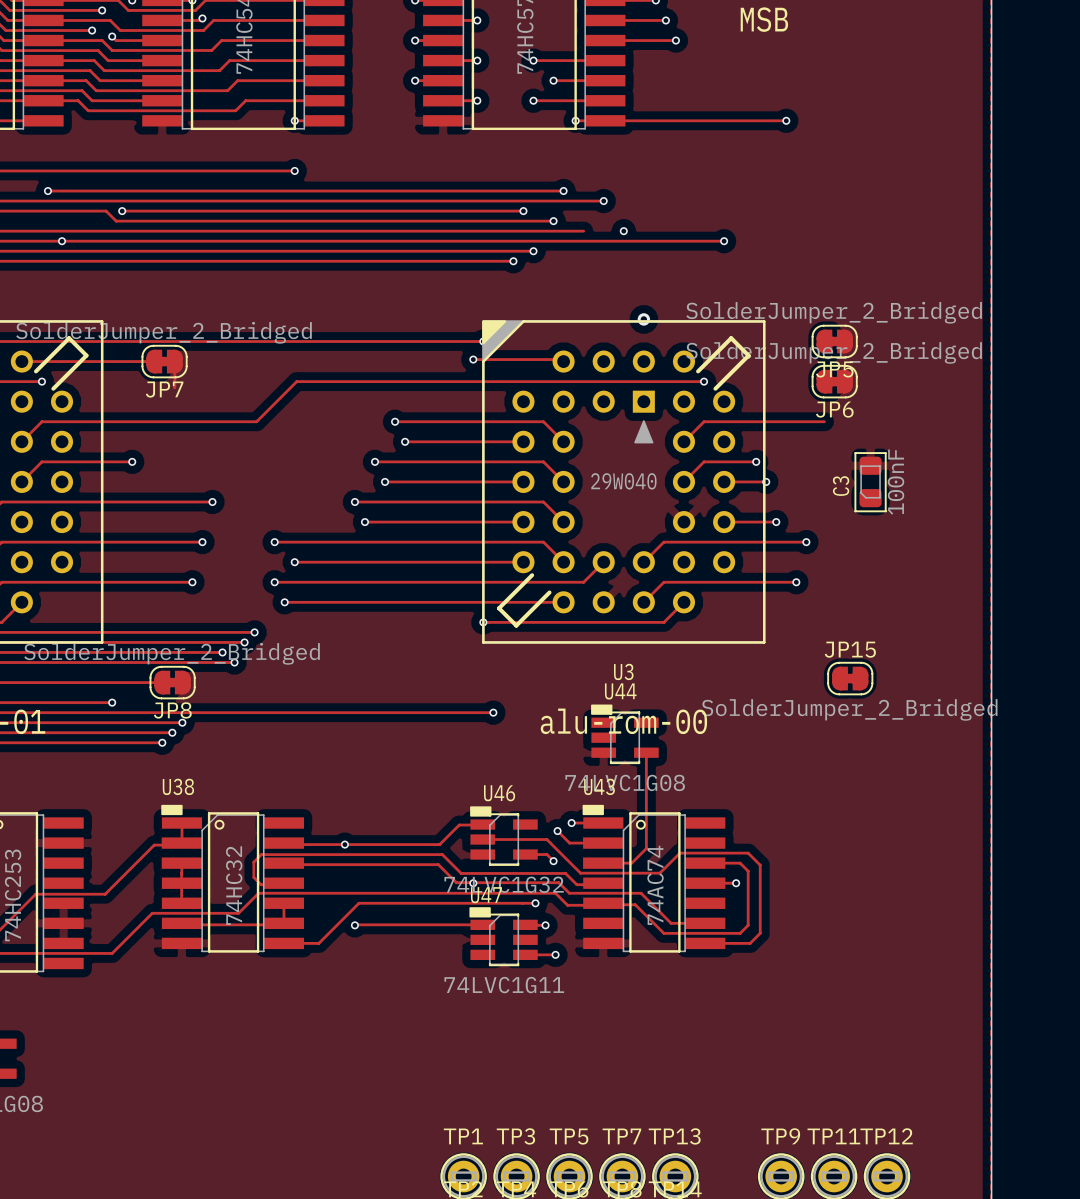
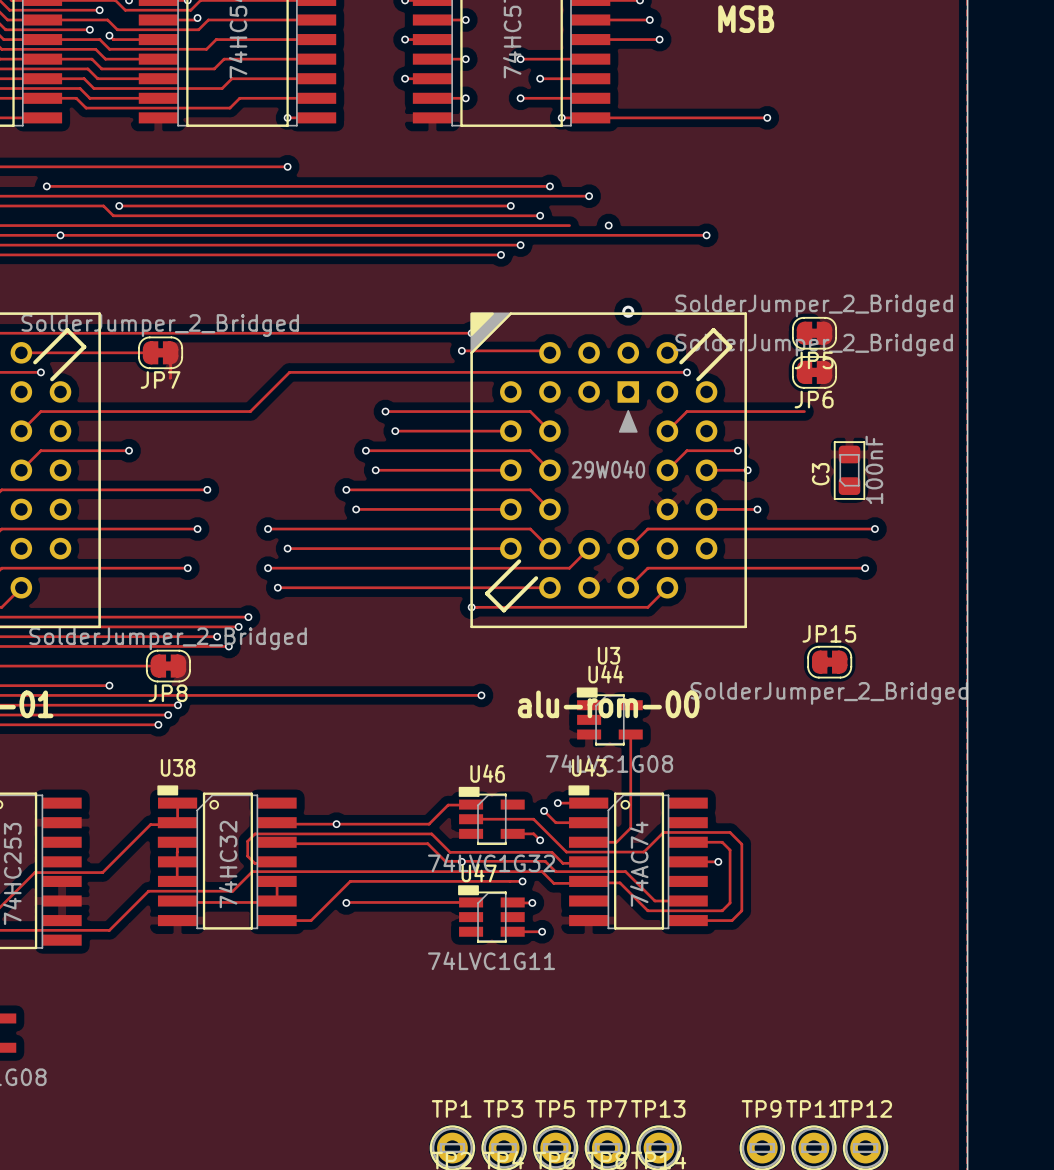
track: none -> (786, 529) (874, 529)
via: (806, 542) -> none
via: none -> (874, 529)
track: none -> (777, 568) (865, 568)
via: (796, 582) -> none
via: none -> (865, 568)

